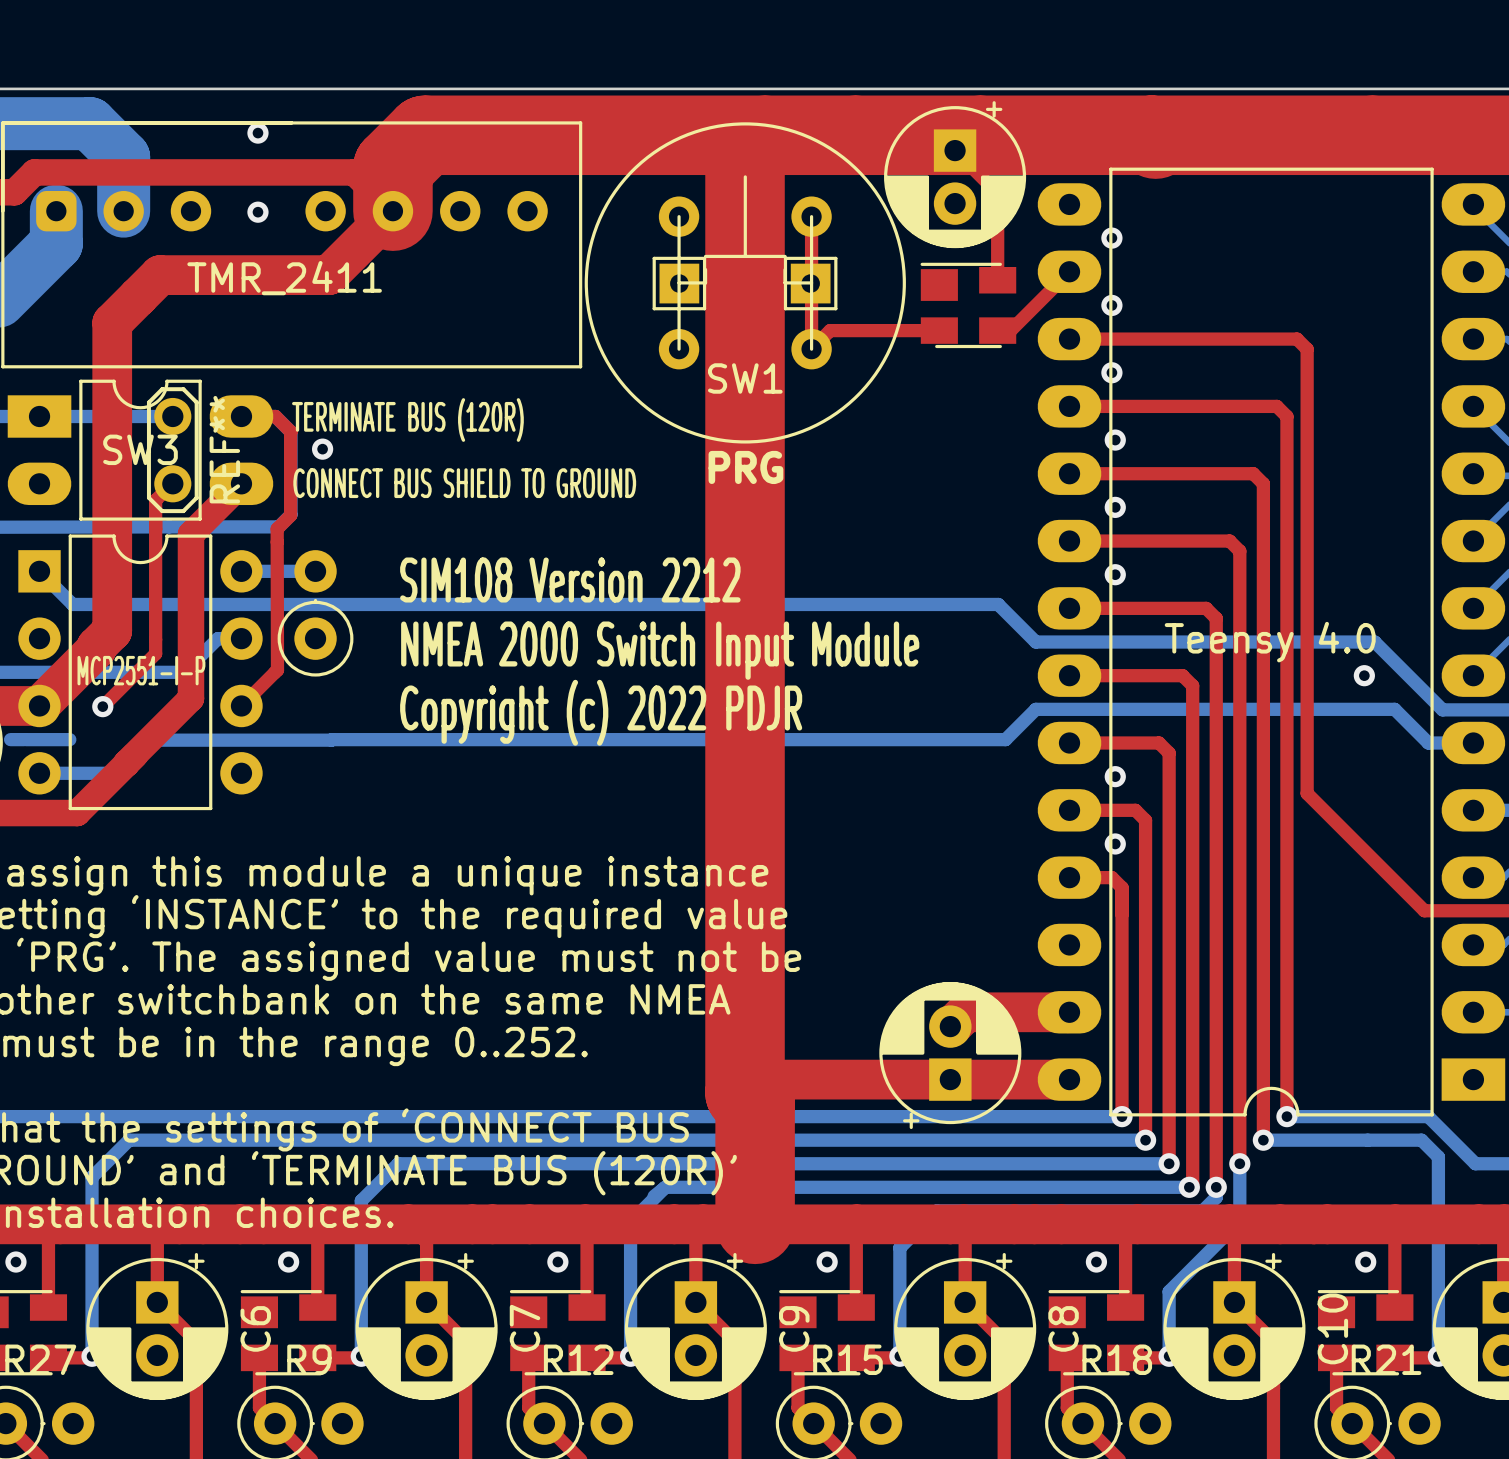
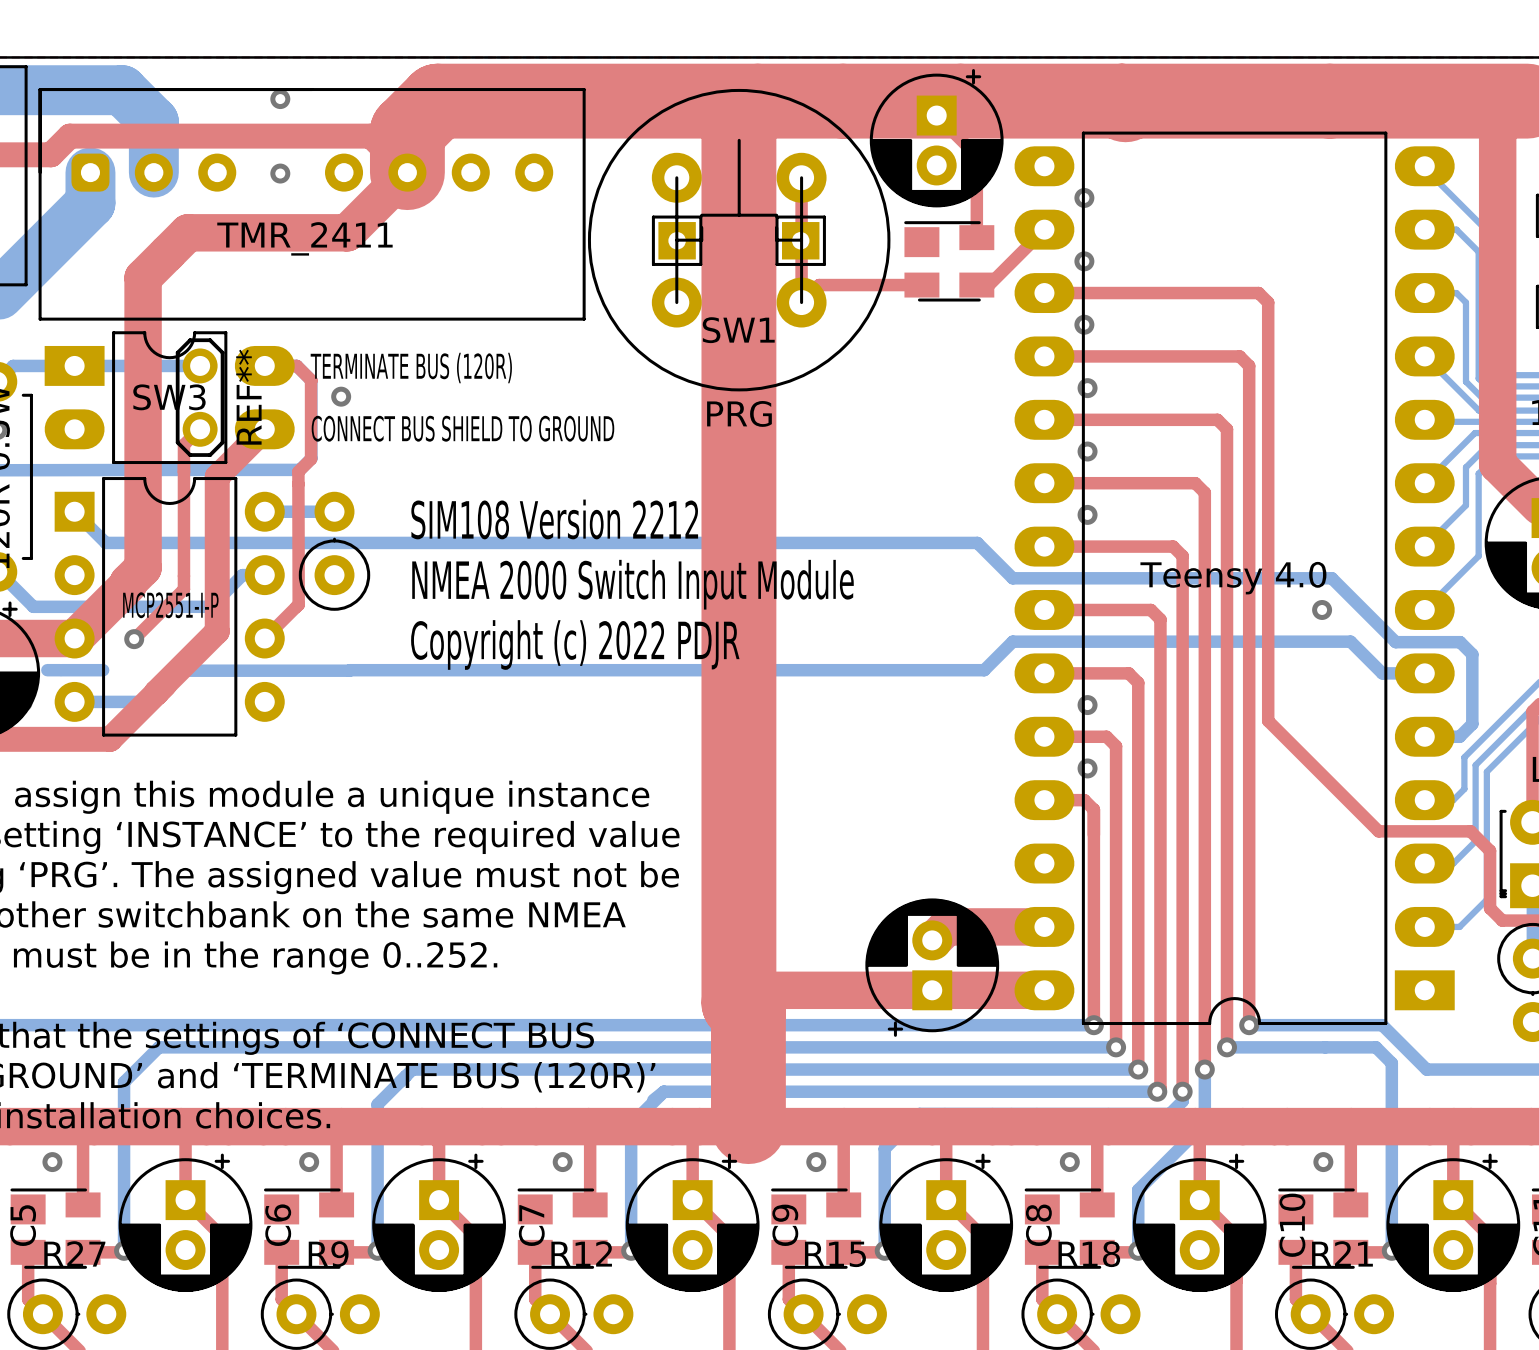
SW1 footprint: [584, 122, 906, 444] -> [587, 88, 891, 392]

